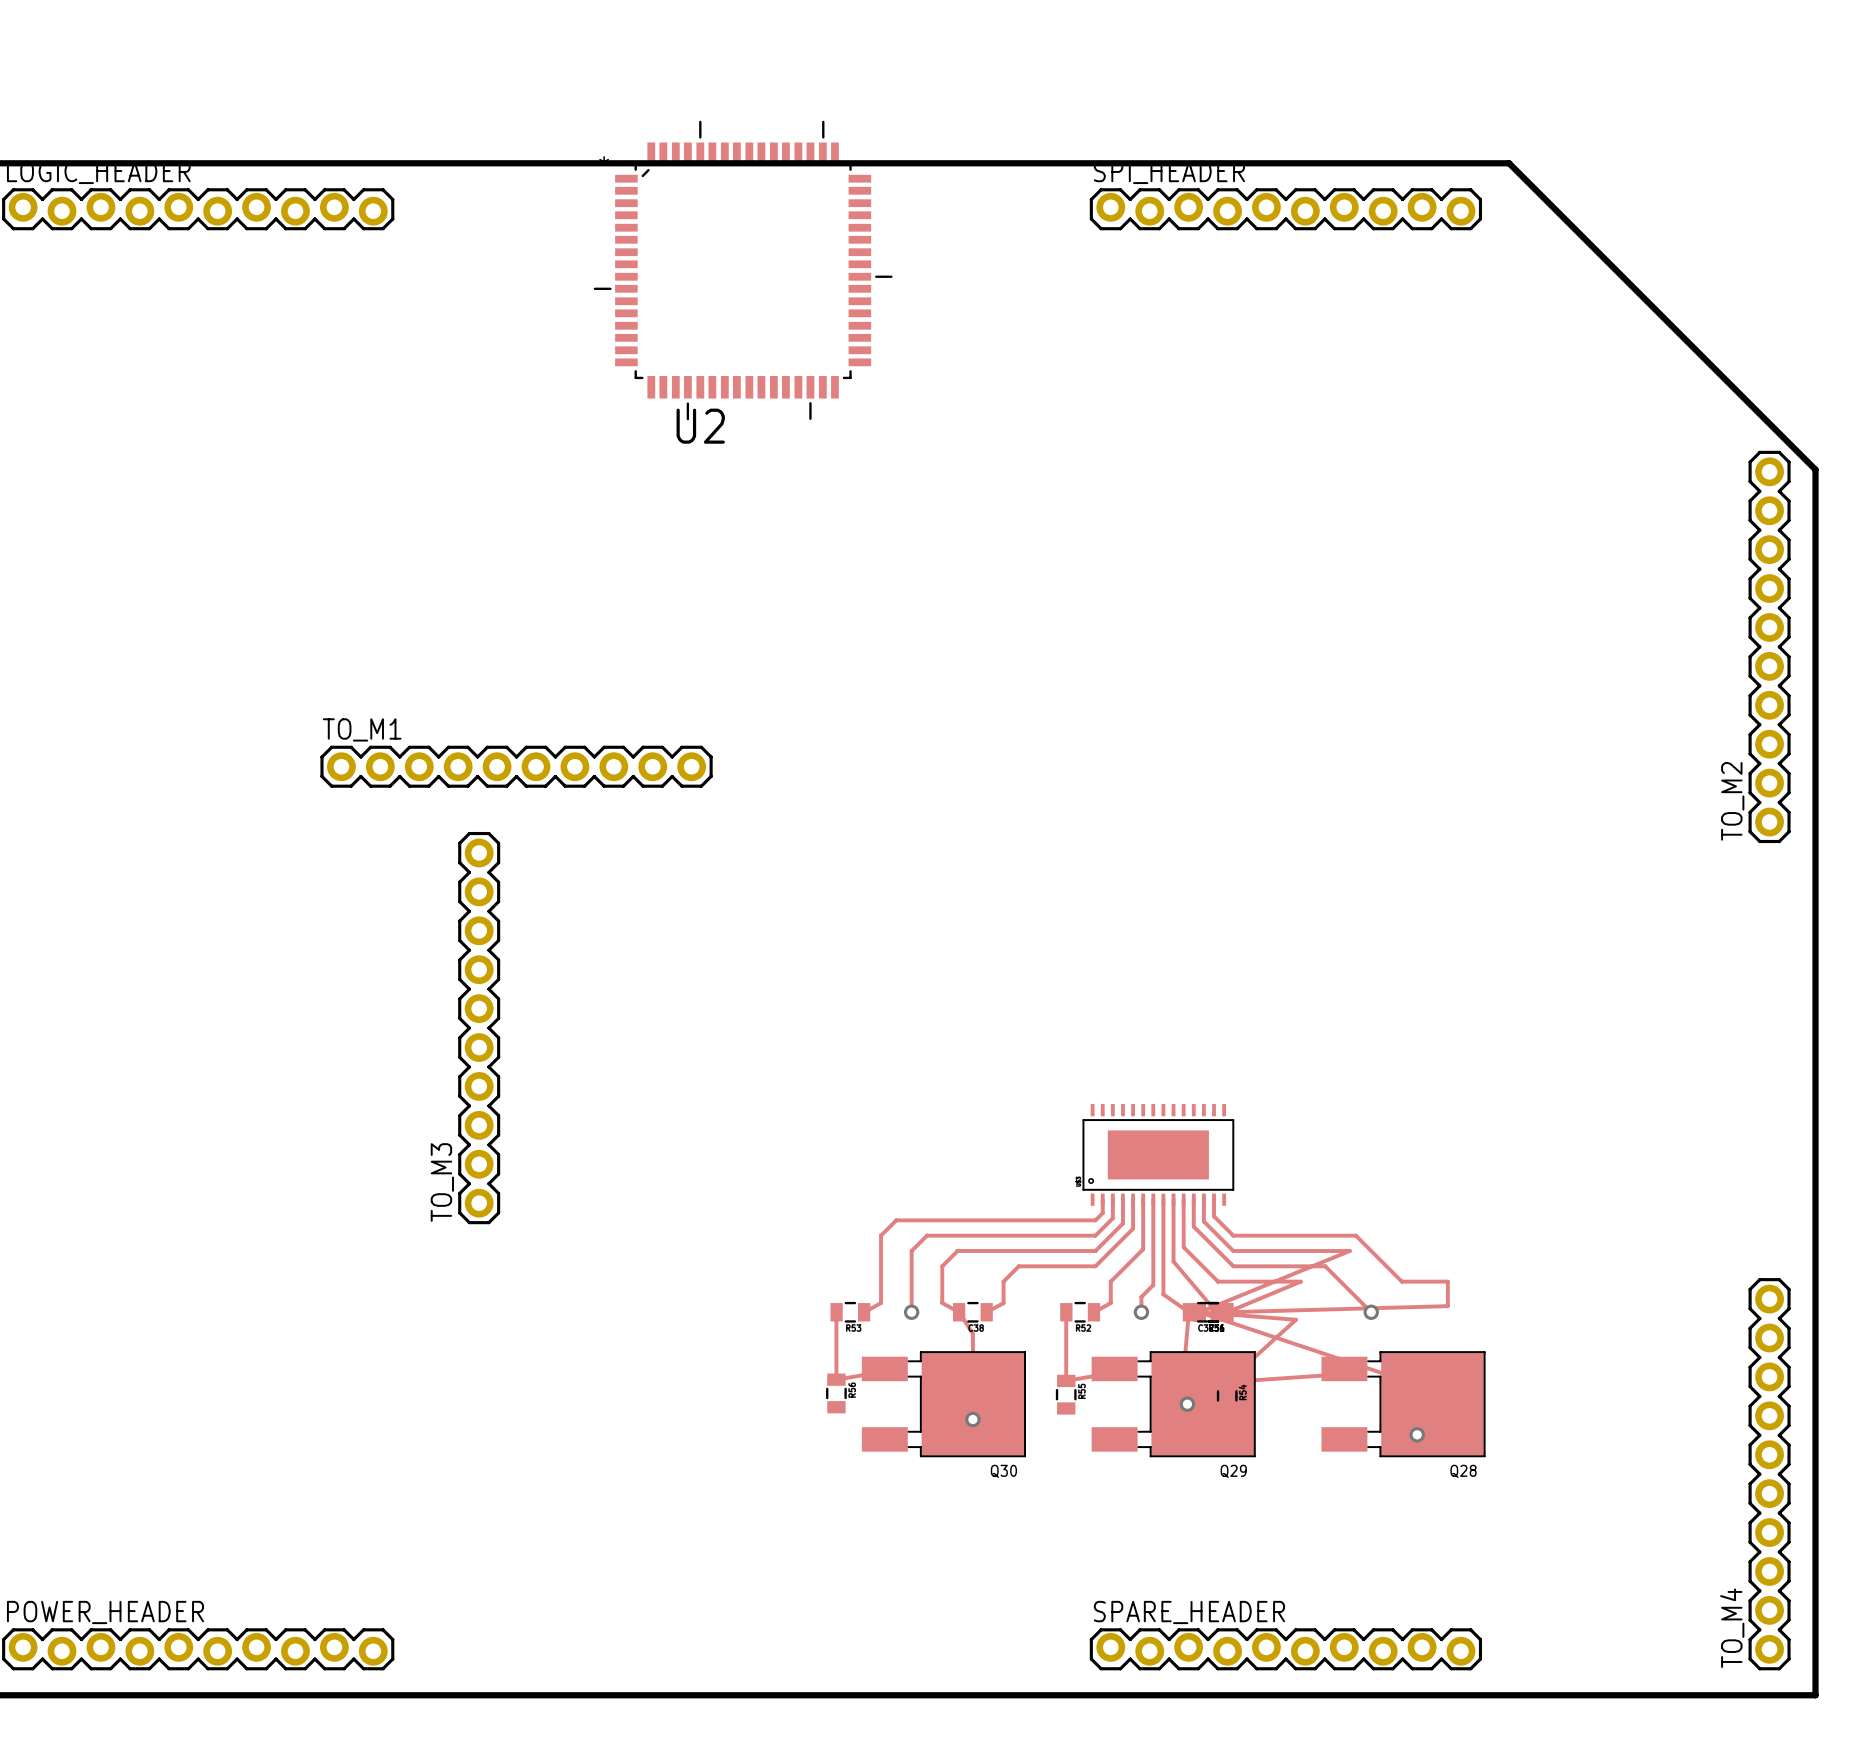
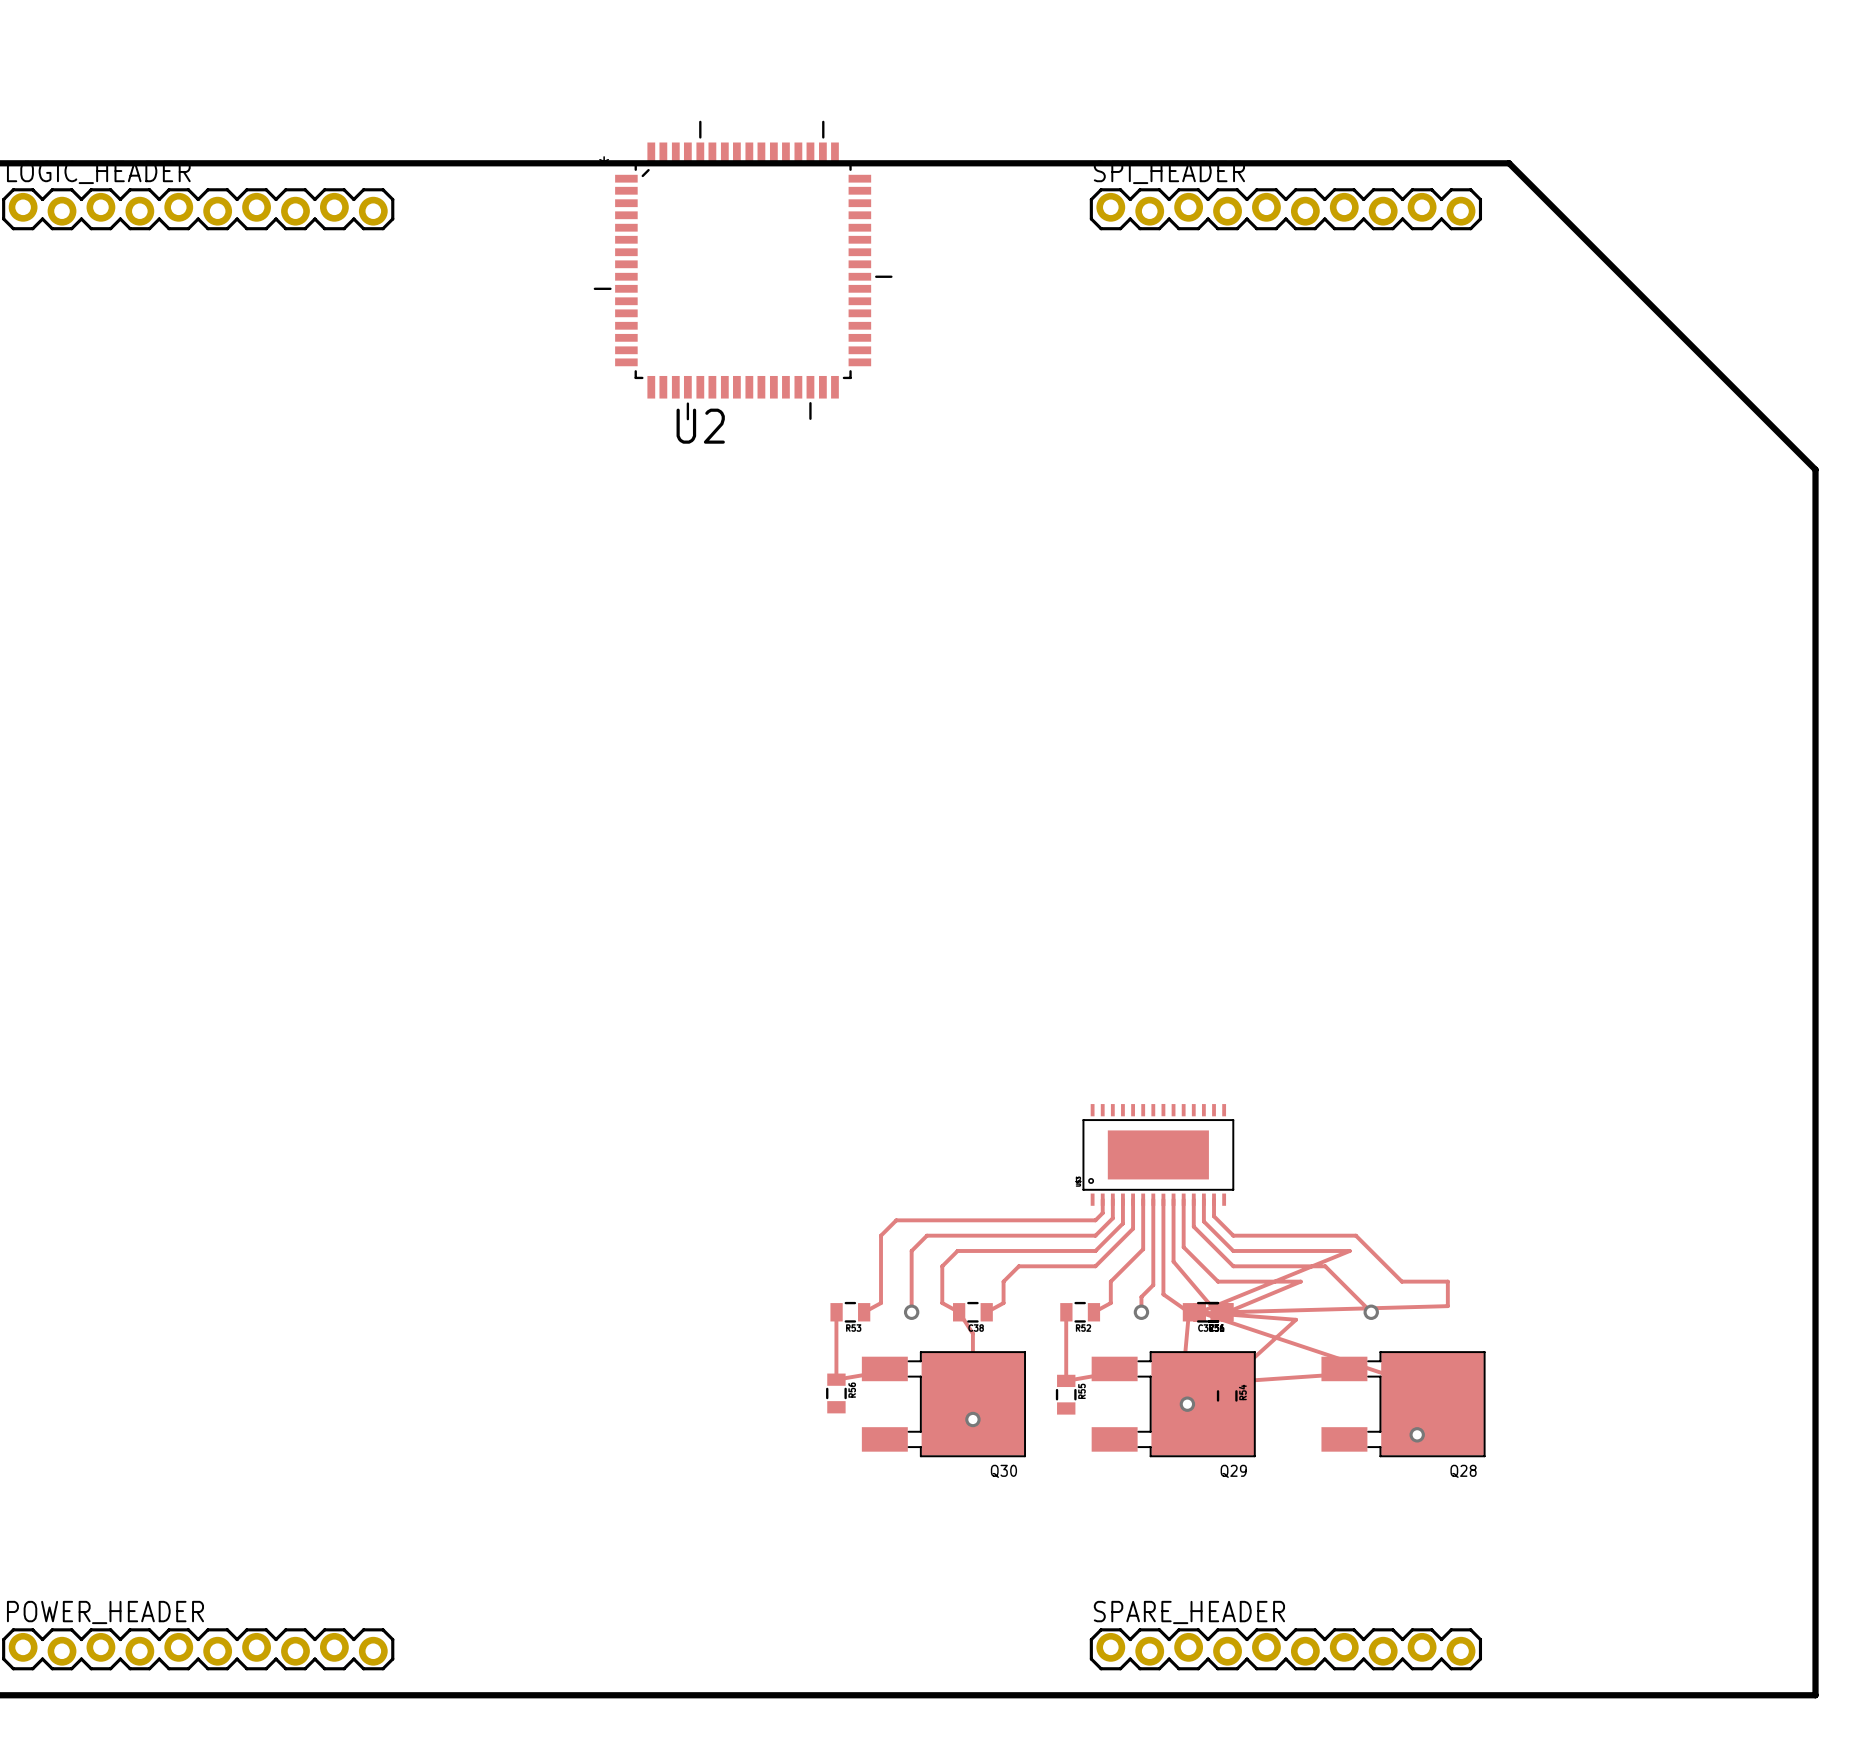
TO_M2: (1769, 646) -> none
TO_M1: (516, 766) -> none
TO_M3: (479, 1028) -> none
TO_M4: (1769, 1474) -> none

